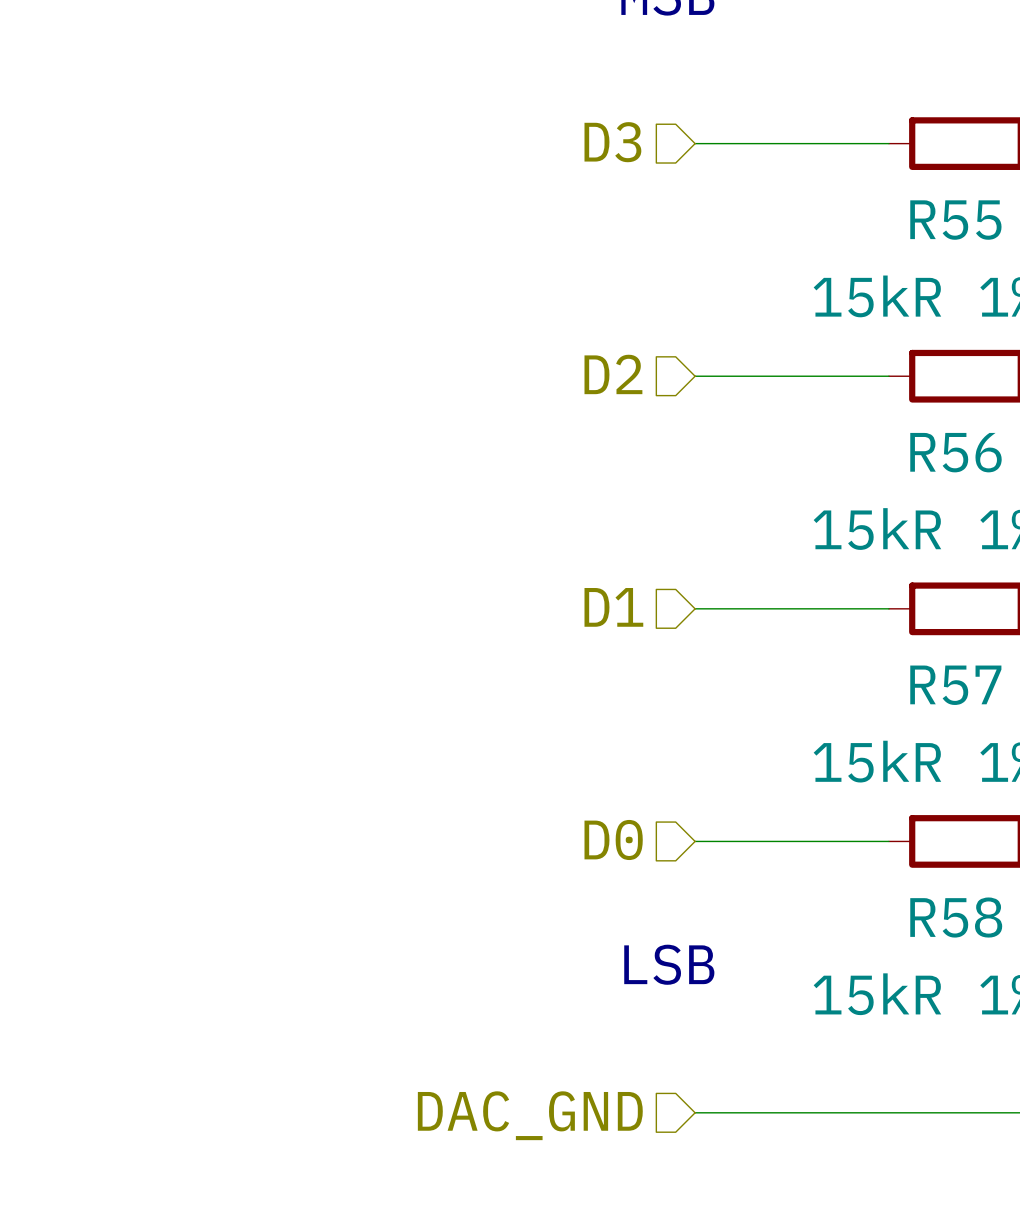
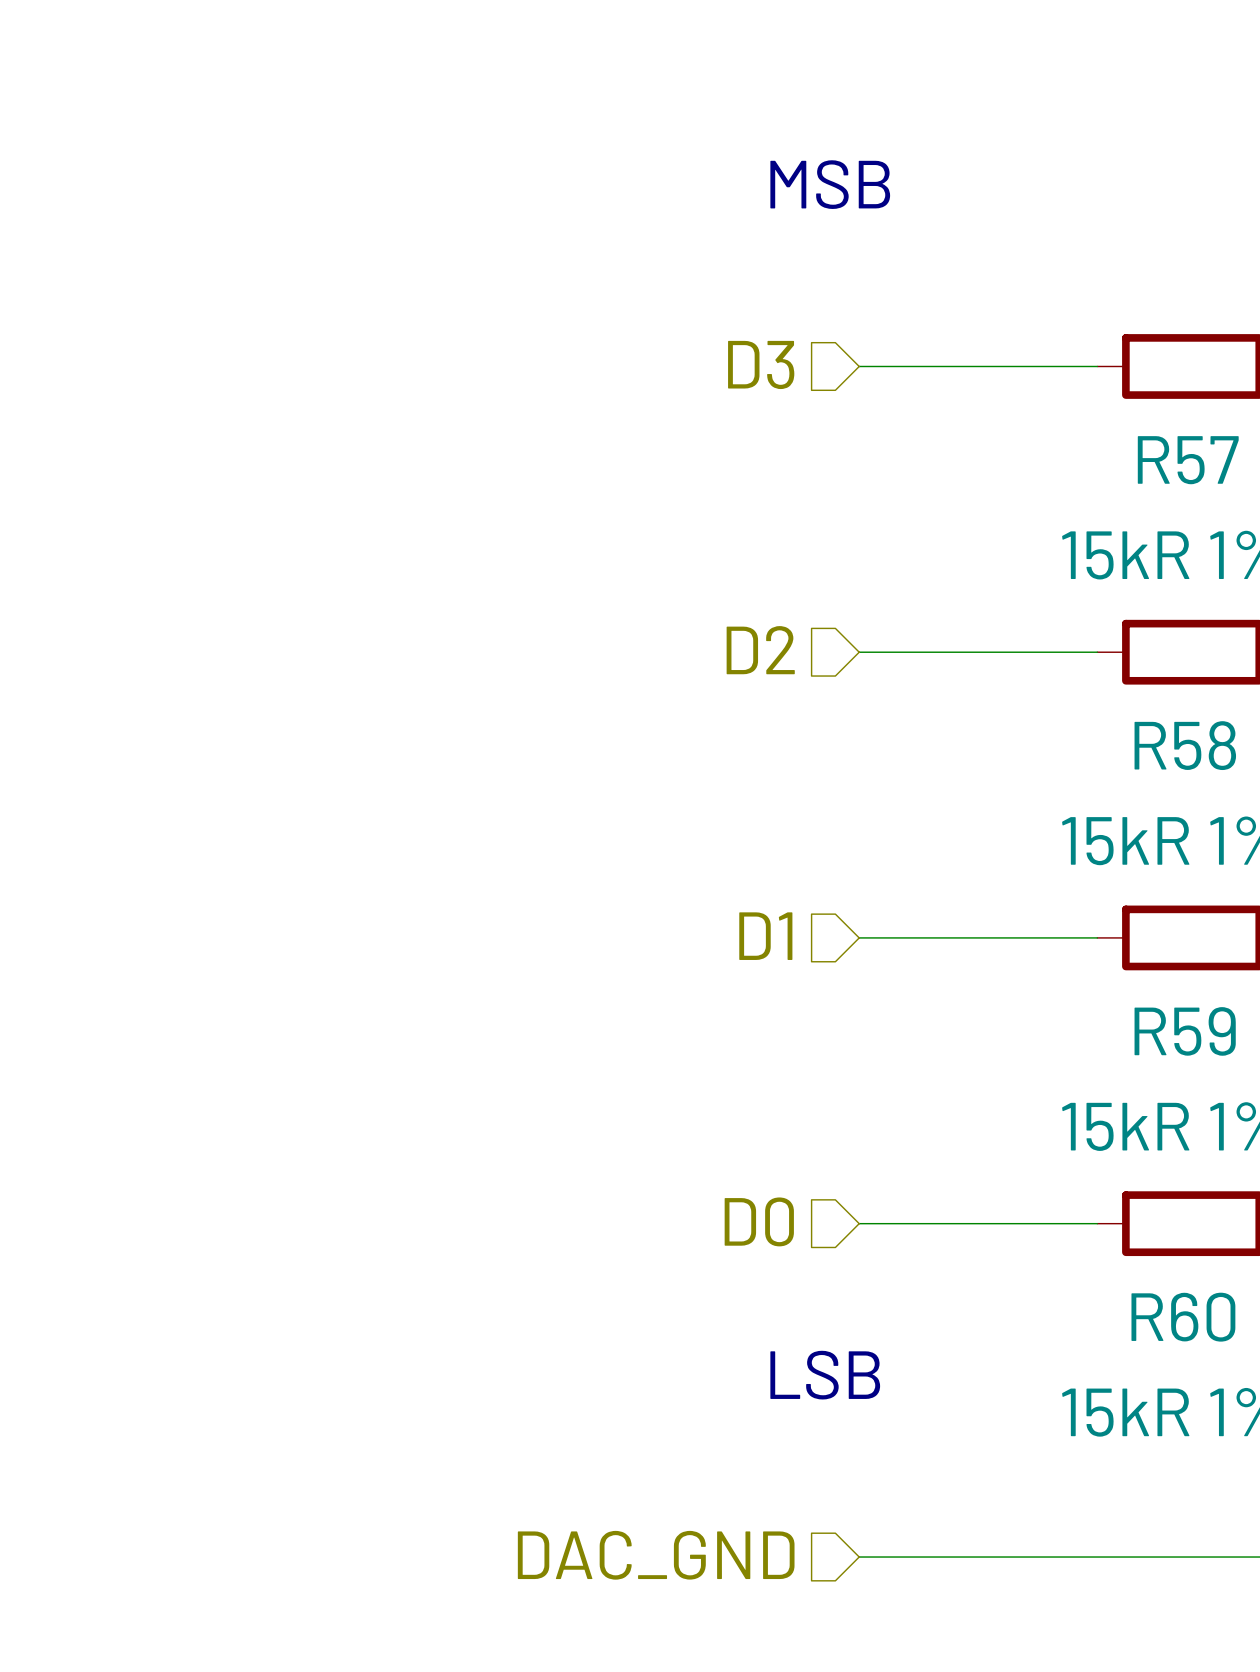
R55 name: R55 (955, 220) -> R57 (1188, 460)
R56 name: R56 (955, 452) -> R58 (1185, 745)
R57 name: R57 (955, 685) -> R59 (1185, 1031)
R58 name: R58 (956, 917) -> R60 (1183, 1317)

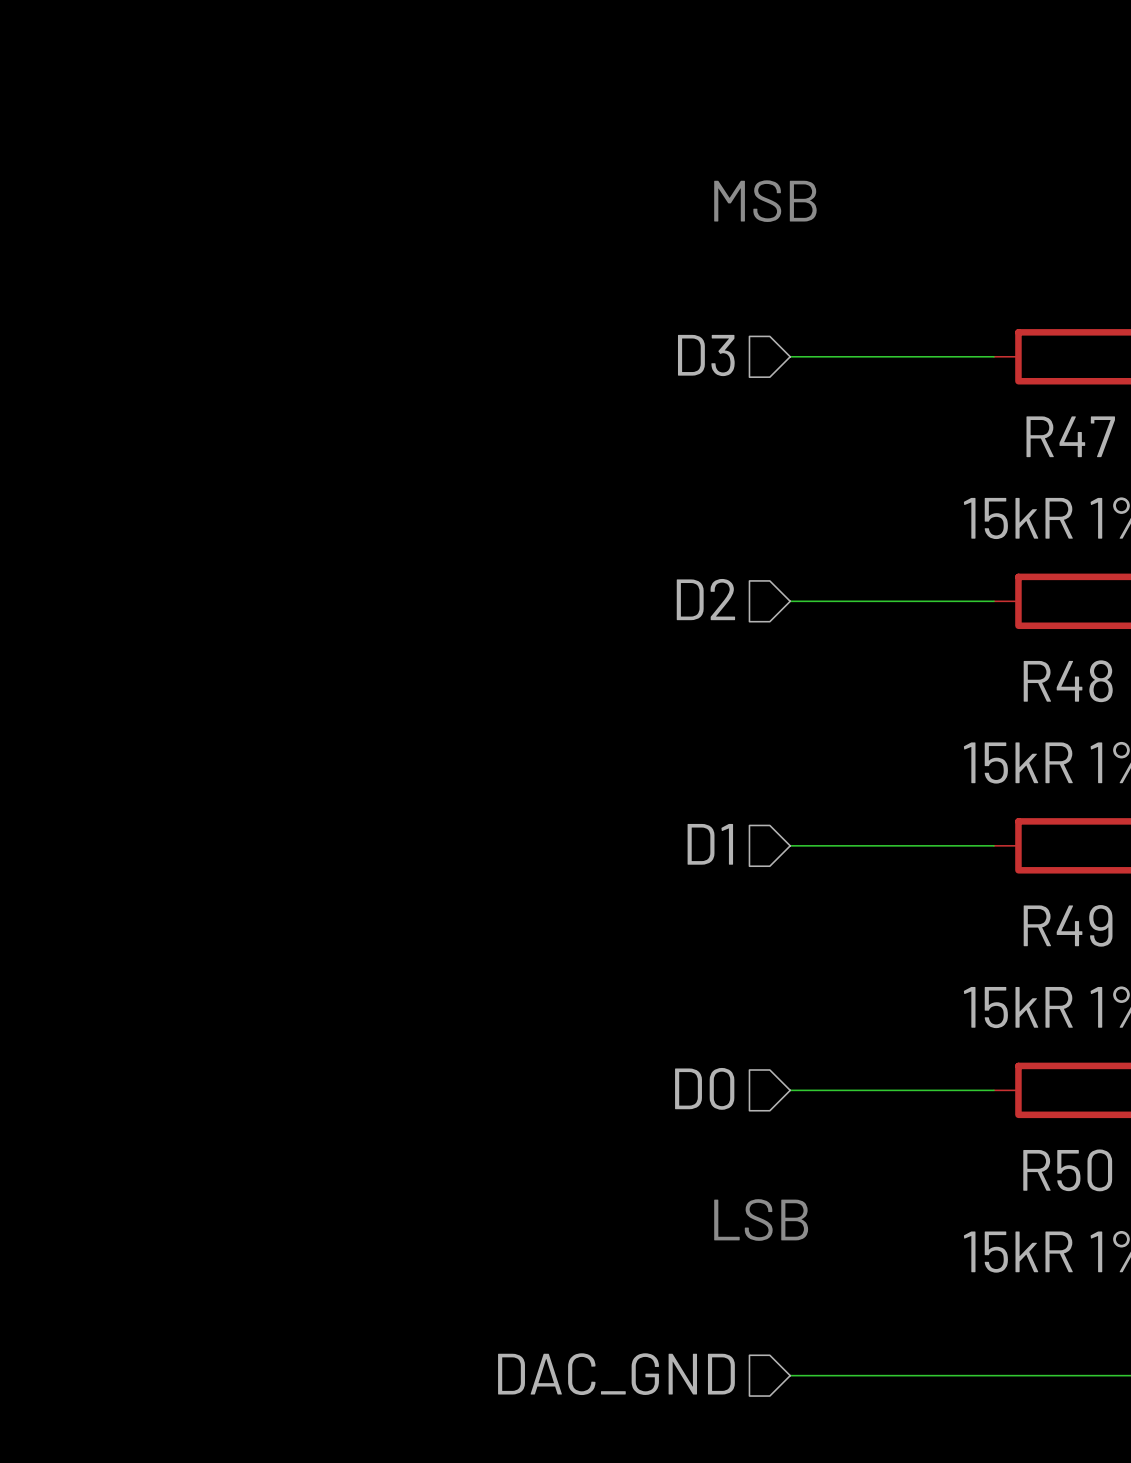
R57 name: R57 (1188, 460) -> R47 (1070, 436)
R58 name: R58 (1185, 745) -> R48 (1068, 681)
R59 name: R59 (1185, 1031) -> R49 (1068, 925)
R60 name: R60 (1183, 1317) -> R50 (1067, 1170)

